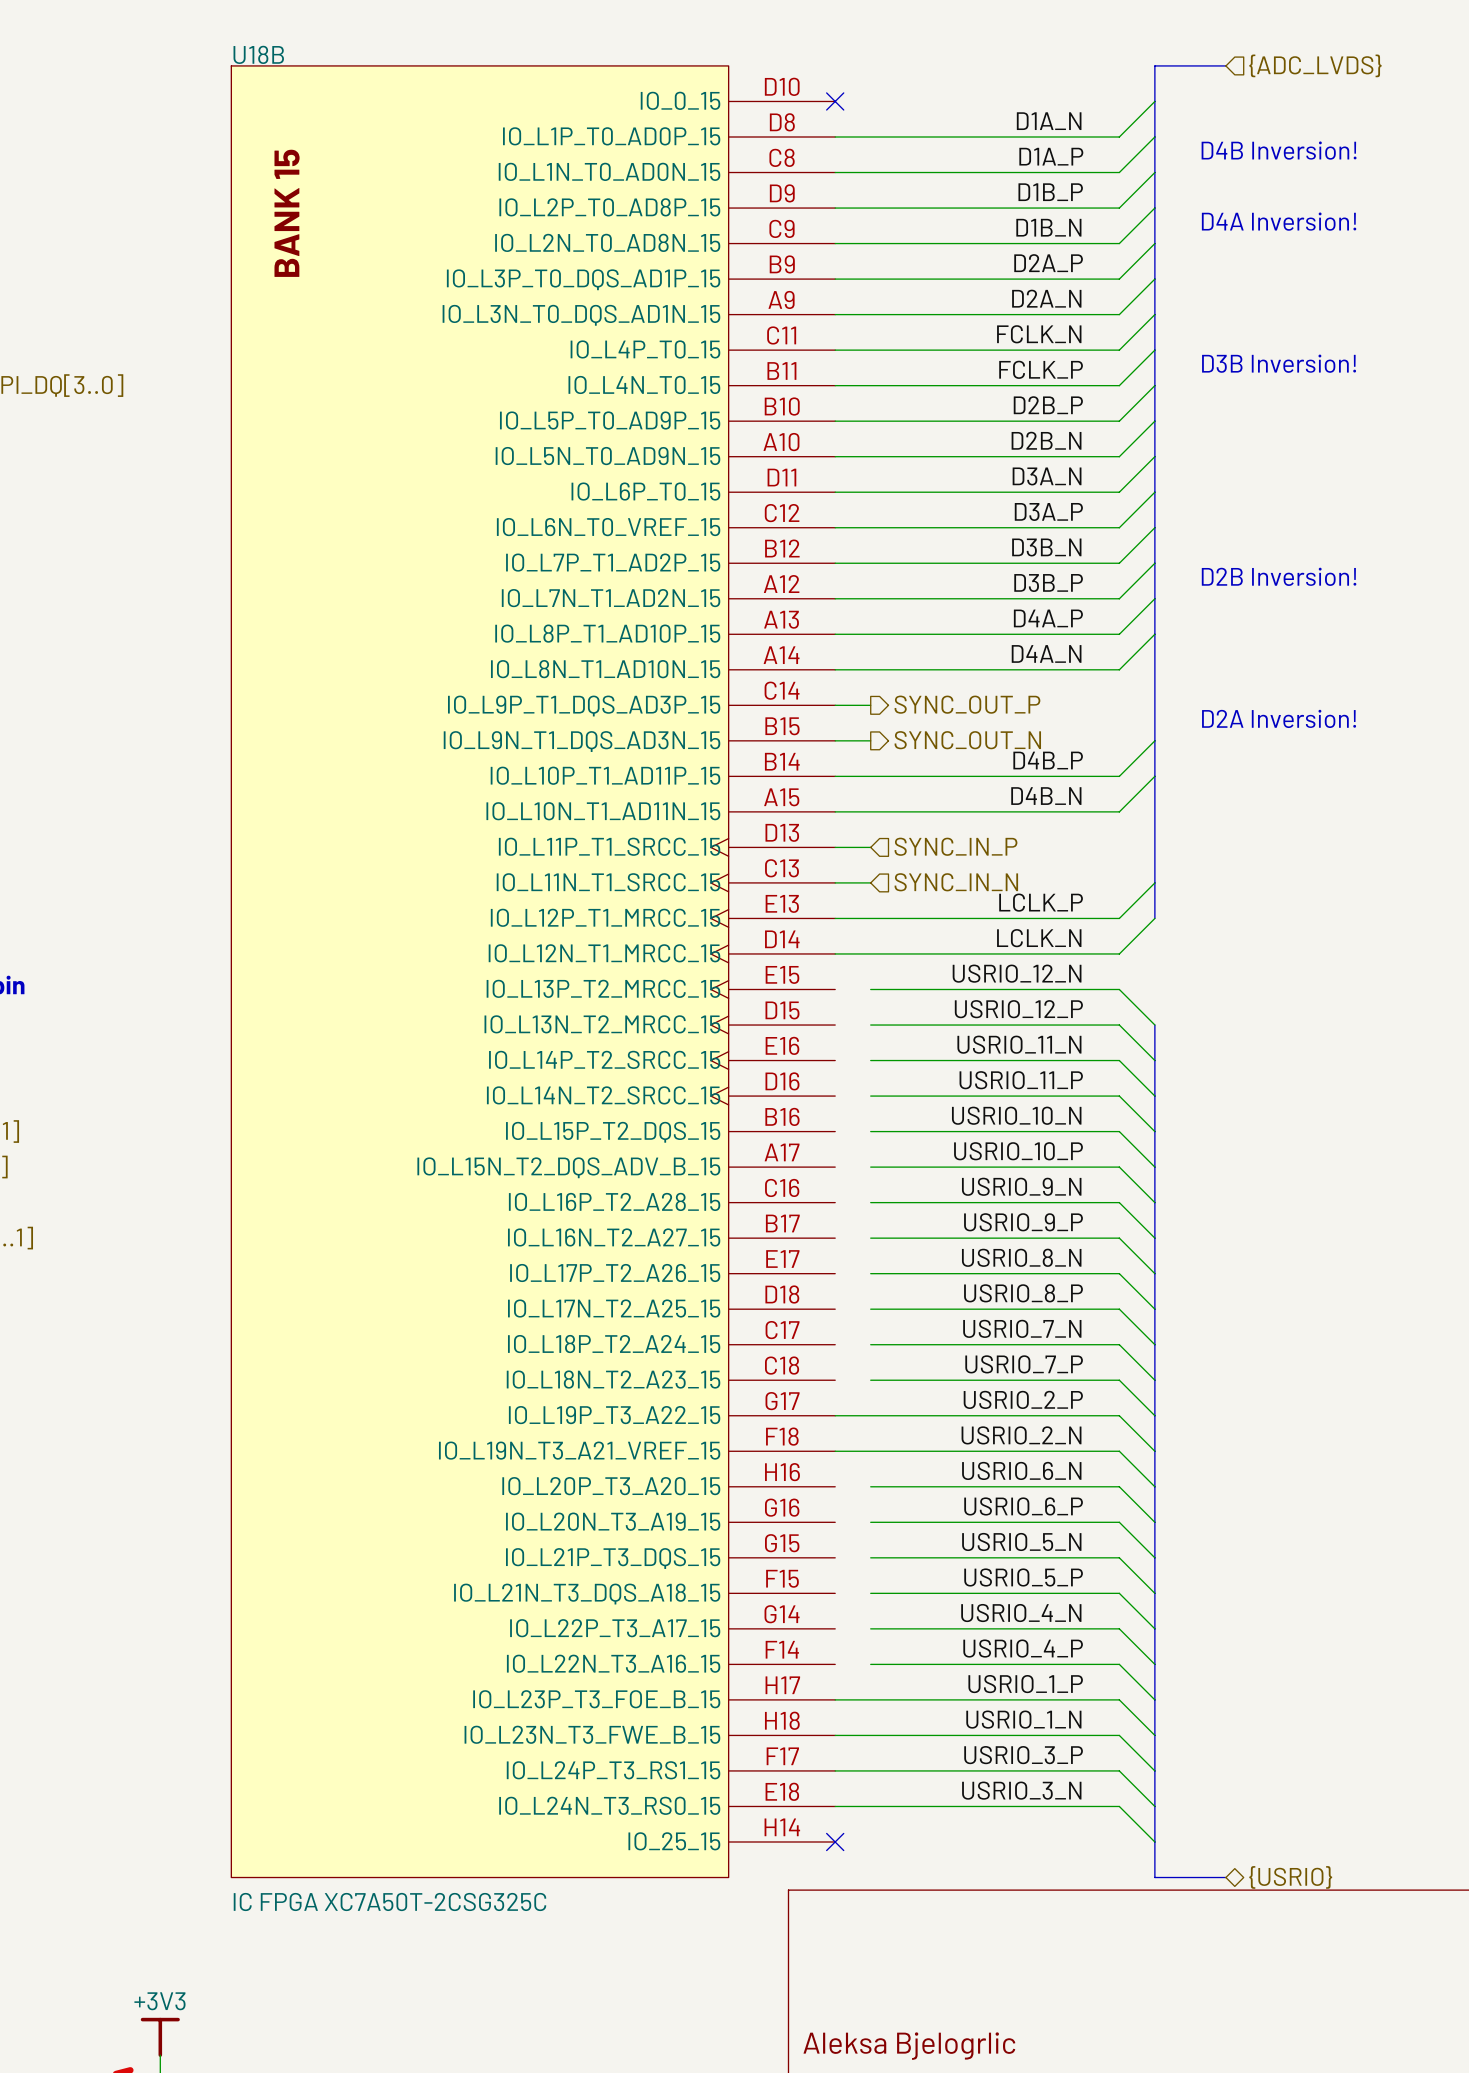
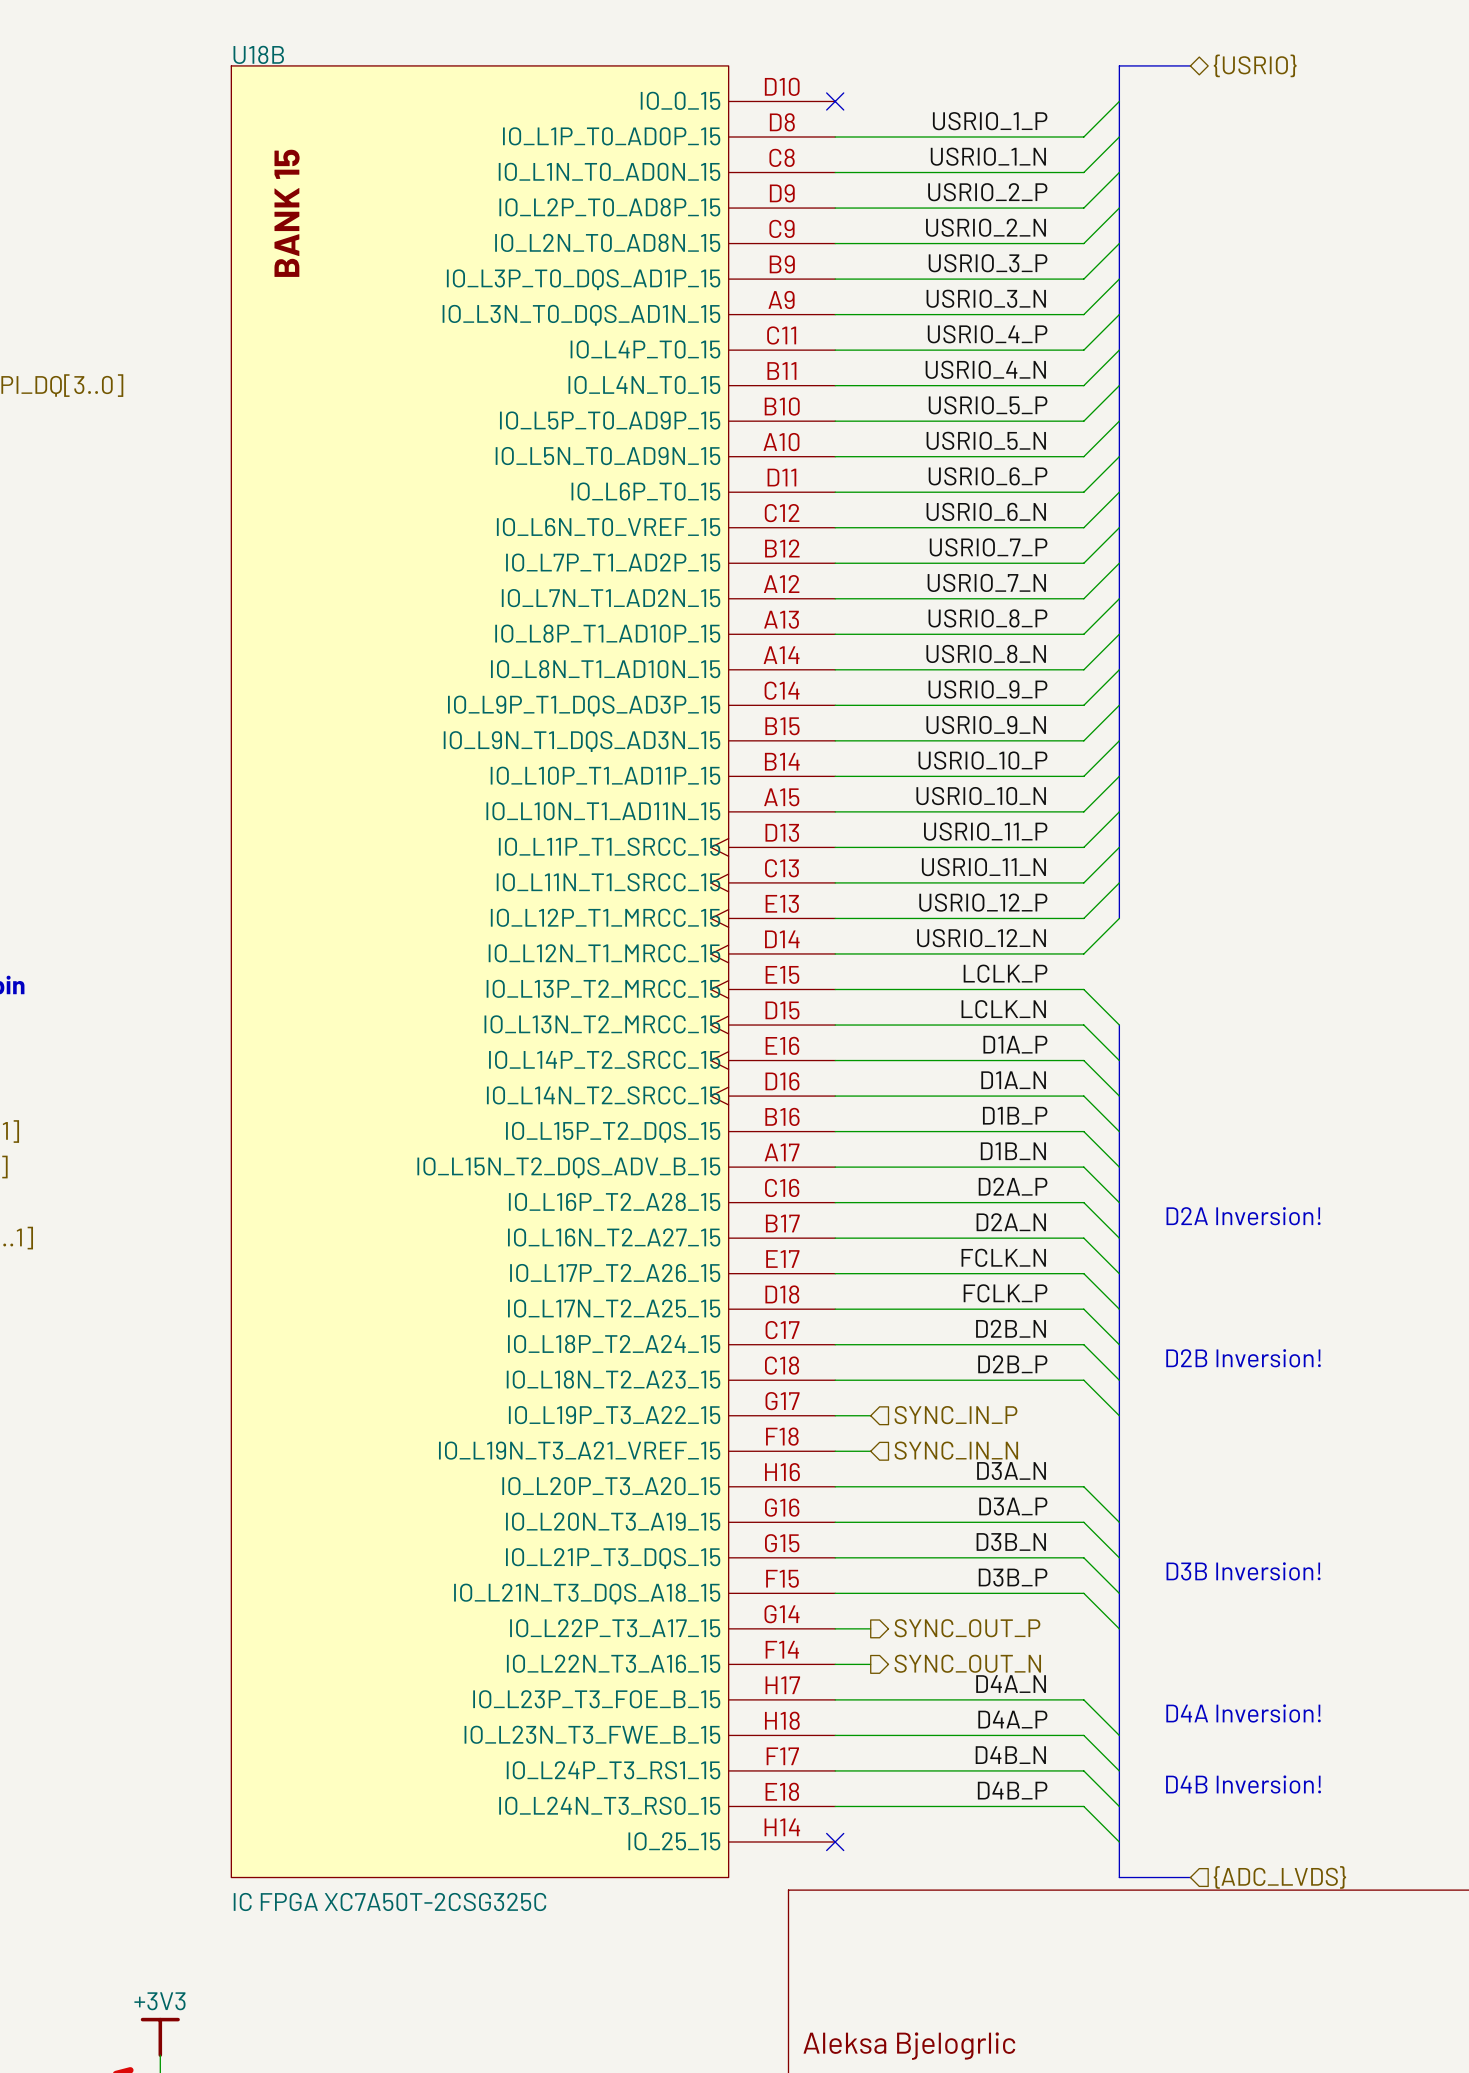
bus: (1154, 65) (1154, 918) -> (1154, 65) (1119, 65) (1119, 918)
bus: (1190, 65) (1225, 65) -> none
hierarchical label: none -> {USRIO} (1255, 65)
hierarchical label: {ADC_LVDS} (1315, 65) -> none
wire: (1154, 101) (1119, 136) (1083, 136) -> (1119, 101) (1083, 136)
label: none -> USRIO_1_P (990, 121)
label: D1A_N (1049, 121) -> none
wire: (1154, 136) (1119, 172) (1083, 172) -> (1119, 136) (1083, 172)
text: D4B Inversion! (1279, 150) -> none
label: none -> USRIO_1_N (988, 156)
label: D1A_P (1051, 156) -> none
wire: (1154, 172) (1119, 208) (1083, 208) -> (1119, 172) (1083, 208)
label: none -> USRIO_2_P (987, 192)
label: D1B_P (1050, 192) -> none
wire: (1154, 208) (1119, 243) (1083, 243) -> (1119, 208) (1083, 243)
text: D4A Inversion! (1279, 221) -> none
label: none -> USRIO_2_N (986, 227)
label: D1B_N (1048, 227) -> none
wire: (1154, 243) (1119, 279) (1083, 279) -> (1119, 243) (1083, 279)
label: none -> USRIO_3_P (988, 263)
label: D2A_P (1048, 263) -> none
wire: (1154, 279) (1119, 314) (1083, 314) -> (1119, 279) (1083, 314)
label: none -> USRIO_3_N (986, 298)
label: D2A_N (1046, 298) -> none
wire: (1154, 314) (1119, 350) (1083, 350) -> (1119, 314) (1083, 350)
label: none -> USRIO_4_P (987, 334)
label: FCLK_N (1039, 334) -> none
wire: (1154, 350) (1119, 385) (1083, 385) -> (1119, 350) (1083, 385)
text: D3B Inversion! (1279, 363) -> none
label: none -> USRIO_4_N (985, 369)
label: FCLK_P (1041, 369) -> none
wire: (1154, 385) (1119, 421) (1083, 421) -> (1119, 385) (1083, 421)
label: none -> USRIO_5_P (988, 405)
label: D2B_P (1048, 405) -> none
wire: (1154, 421) (1119, 456) (1083, 456) -> (1119, 421) (1083, 456)
label: none -> USRIO_5_N (986, 440)
label: D2B_N (1046, 440) -> none
wire: (1154, 456) (1119, 492) (1083, 492) -> (1119, 456) (1083, 492)
label: none -> USRIO_6_P (988, 476)
label: D3A_N (1047, 476) -> none
wire: (1154, 492) (1119, 527) (1083, 527) -> (1119, 492) (1083, 527)
label: none -> USRIO_6_N (986, 511)
label: D3A_P (1048, 511) -> none
wire: (1154, 527) (1119, 563) (1083, 563) -> (1119, 527) (1083, 563)
label: none -> USRIO_7_P (988, 547)
label: D3B_N (1046, 547) -> none
wire: (1154, 563) (1119, 598) (1083, 598) -> (1119, 563) (1083, 598)
text: D2B Inversion! (1279, 576) -> none
label: none -> USRIO_7_N (986, 582)
label: D3B_P (1048, 583) -> none
wire: (1154, 598) (1119, 634) (1083, 634) -> (1119, 598) (1083, 634)
label: none -> USRIO_8_P (987, 618)
label: D4A_P (1048, 618) -> none
wire: (1154, 634) (1119, 669) (1083, 669) -> (1119, 634) (1083, 669)
label: none -> USRIO_8_N (986, 653)
label: D4A_N (1046, 653) -> none
wire: none -> (1119, 669) (1083, 705) (870, 705)
label: none -> USRIO_9_P (987, 689)
hierarchical label: SYNC_OUT_P (967, 704) -> none
wire: none -> (1119, 705) (1083, 740) (870, 740)
text: D2A Inversion! (1279, 718) -> none
label: none -> USRIO_9_N (986, 725)
hierarchical label: SYNC_OUT_N (967, 740) -> none
wire: (1154, 740) (1119, 776) (1083, 776) -> (1119, 740) (1083, 776)
label: none -> USRIO_10_P (982, 760)
label: D4B_P (1048, 760) -> none
wire: (1154, 776) (1119, 811) (1083, 811) -> (1119, 776) (1083, 811)
label: D4B_N (1046, 796) -> none
wire: none -> (1119, 811) (1083, 847) (870, 847)
hierarchical label: SYNC_IN_P (956, 846) -> none
wire: none -> (1119, 847) (1083, 882) (870, 882)
hierarchical label: SYNC_IN_N (956, 882) -> none
wire: (1154, 882) (1119, 918) (1083, 918) -> (1119, 882) (1083, 918)
label position: LCLK_P (1041, 902) -> LCLK_P (1005, 973)
wire: (1154, 918) (1119, 953) (1083, 953) -> (1119, 918) (1083, 953)
label position: LCLK_N (1039, 938) -> LCLK_N (1003, 1009)
label position: USRIO_12_N (1017, 973) -> USRIO_12_N (981, 938)
wire: none -> (835, 989) (870, 989)
wire: (1083, 989) (1119, 989) (1154, 1025) -> (1083, 989) (1119, 1025)
label position: USRIO_12_P (1018, 1009) -> USRIO_12_P (983, 902)
wire: none -> (835, 1025) (870, 1025)
wire: (1083, 1025) (1119, 1025) (1154, 1060) -> (1083, 1025) (1119, 1060)
bus: (1154, 1025) (1154, 1877) -> (1119, 1025) (1119, 1877) (1154, 1877)
label: none -> D1A_P (1015, 1044)
label position: USRIO_11_N (1019, 1044) -> USRIO_11_N (983, 867)
wire: none -> (835, 1060) (870, 1060)
wire: (1083, 1060) (1119, 1060) (1154, 1096) -> (1083, 1060) (1119, 1096)
label: none -> D1A_N (1013, 1080)
label position: USRIO_11_P (1021, 1080) -> USRIO_11_P (985, 831)
wire: none -> (835, 1096) (870, 1096)
wire: (1083, 1096) (1119, 1096) (1154, 1131) -> (1083, 1096) (1119, 1131)
label: none -> D1B_P (1015, 1115)
label position: USRIO_10_N (1016, 1115) -> USRIO_10_N (981, 796)
wire: none -> (835, 1131) (870, 1131)
wire: (1083, 1131) (1119, 1131) (1154, 1167) -> (1083, 1131) (1119, 1167)
label: none -> D1B_N (1013, 1151)
label: USRIO_10_P (1018, 1151) -> none
wire: none -> (835, 1167) (870, 1167)
wire: (1083, 1167) (1119, 1167) (1154, 1202) -> (1083, 1167) (1119, 1202)
label: none -> D2A_P (1013, 1186)
label: USRIO_9_N (1021, 1186) -> none
wire: none -> (835, 1202) (870, 1202)
wire: (1083, 1202) (1119, 1202) (1154, 1238) -> (1083, 1202) (1119, 1238)
text: none -> D2A Inversion! (1243, 1216)
label: none -> D2A_N (1011, 1222)
label: USRIO_9_P (1023, 1222) -> none
wire: none -> (835, 1238) (870, 1238)
wire: (1083, 1238) (1119, 1238) (1154, 1273) -> (1083, 1238) (1119, 1273)
label: none -> FCLK_N (1003, 1257)
label: USRIO_8_N (1021, 1257) -> none
wire: none -> (835, 1273) (870, 1273)
wire: (1083, 1273) (1119, 1273) (1154, 1309) -> (1083, 1273) (1119, 1309)
label: none -> FCLK_P (1005, 1293)
label: USRIO_8_P (1023, 1293) -> none
wire: none -> (835, 1309) (870, 1309)
wire: (1083, 1309) (1119, 1309) (1154, 1344) -> (1083, 1309) (1119, 1344)
label: none -> D2B_N (1011, 1328)
label: USRIO_7_N (1022, 1328) -> none
wire: none -> (835, 1344) (870, 1344)
wire: (1083, 1344) (1119, 1344) (1154, 1380) -> (1083, 1344) (1119, 1380)
text: none -> D2B Inversion! (1243, 1358)
label: none -> D2B_P (1012, 1364)
label: USRIO_7_P (1024, 1364) -> none
wire: none -> (835, 1380) (870, 1380)
wire: (1083, 1380) (1119, 1380) (1154, 1415) -> (1083, 1380) (1119, 1415)
label: USRIO_2_P (1023, 1399) -> none
wire: (870, 1415) (1119, 1415) (1154, 1451) -> none
hierarchical label: none -> SYNC_IN_P (956, 1415)
label: USRIO_2_N (1021, 1435) -> none
hierarchical label: none -> SYNC_IN_N (956, 1450)
wire: (870, 1451) (1119, 1451) (1154, 1486) -> none
label: USRIO_6_N (1021, 1470) -> none
label: none -> D3A_N (1011, 1471)
wire: none -> (835, 1486) (870, 1486)
wire: (1083, 1486) (1119, 1486) (1154, 1522) -> (1083, 1486) (1119, 1522)
label: none -> D3A_P (1013, 1506)
label: USRIO_6_P (1023, 1506) -> none
wire: none -> (835, 1522) (870, 1522)
wire: (1083, 1522) (1119, 1522) (1154, 1557) -> (1083, 1522) (1119, 1557)
label: USRIO_5_N (1021, 1541) -> none
label: none -> D3B_N (1011, 1542)
wire: none -> (835, 1557) (870, 1557)
wire: (1083, 1557) (1119, 1557) (1154, 1593) -> (1083, 1557) (1119, 1593)
text: none -> D3B Inversion! (1243, 1571)
label: none -> D3B_P (1013, 1577)
label: USRIO_5_P (1023, 1577) -> none
wire: none -> (835, 1593) (870, 1593)
wire: (1083, 1593) (1119, 1593) (1154, 1628) -> (1083, 1593) (1119, 1628)
label: USRIO_4_N (1021, 1613) -> none
wire: (870, 1628) (1119, 1628) (1154, 1664) -> (870, 1628) (835, 1628)
hierarchical label: none -> SYNC_OUT_P (967, 1628)
label: USRIO_4_P (1023, 1648) -> none
hierarchical label: none -> SYNC_OUT_N (967, 1663)
wire: (870, 1664) (1119, 1664) (1154, 1699) -> (870, 1664) (835, 1664)
label: none -> D4A_N (1011, 1684)
label: USRIO_1_P (1025, 1684) -> none
wire: (1083, 1699) (1119, 1699) (1154, 1735) -> (1083, 1699) (1119, 1735)
text: none -> D4A Inversion! (1243, 1713)
label: none -> D4A_P (1012, 1719)
label: USRIO_1_N (1023, 1719) -> none
wire: (1083, 1735) (1119, 1735) (1154, 1770) -> (1083, 1735) (1119, 1770)
label: none -> D4B_N (1010, 1755)
label: USRIO_3_P (1023, 1755) -> none
wire: (1083, 1770) (1119, 1770) (1154, 1806) -> (1083, 1770) (1119, 1806)
text: none -> D4B Inversion! (1243, 1784)
label: none -> D4B_P (1012, 1790)
label: USRIO_3_N (1021, 1790) -> none
wire: (1083, 1806) (1119, 1806) (1154, 1841) -> (1083, 1806) (1119, 1841)
bus: (1190, 1877) (1225, 1877) -> none
hierarchical label: none -> {ADC_LVDS} (1279, 1877)
hierarchical label: {USRIO} (1290, 1877) -> none

